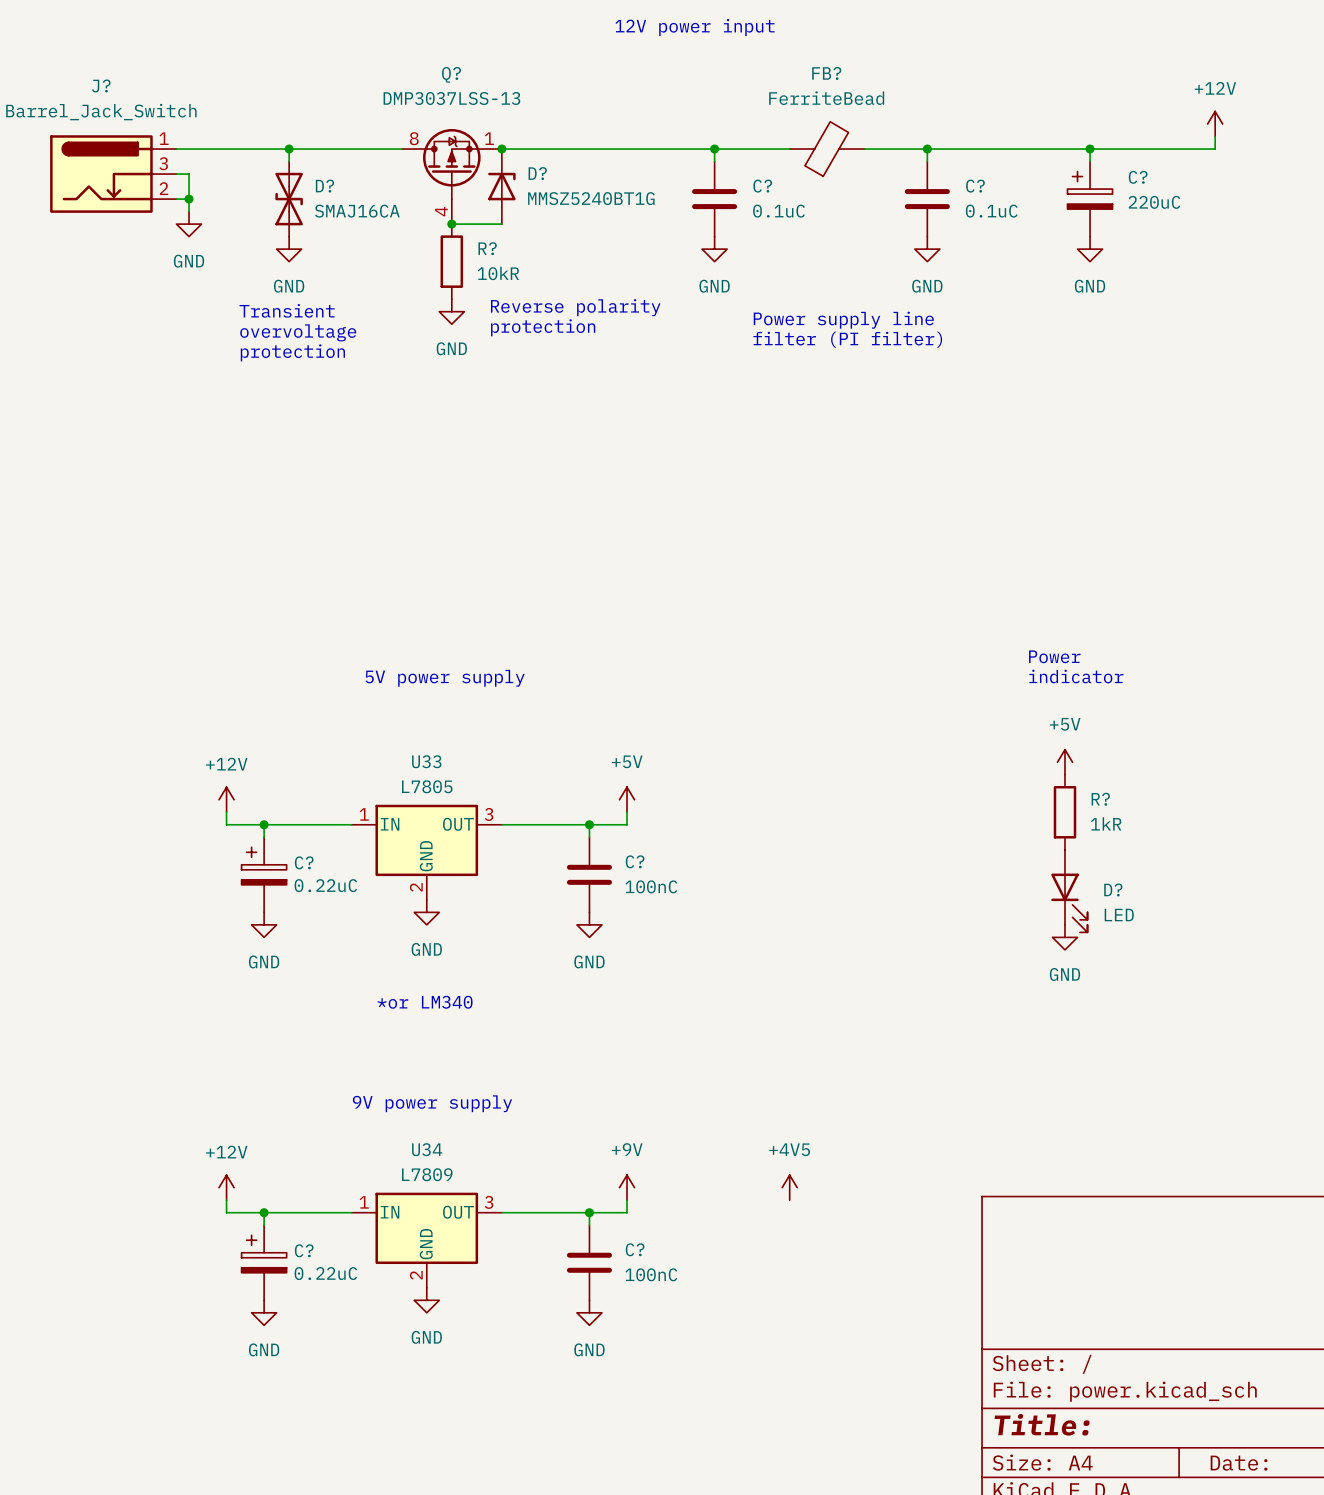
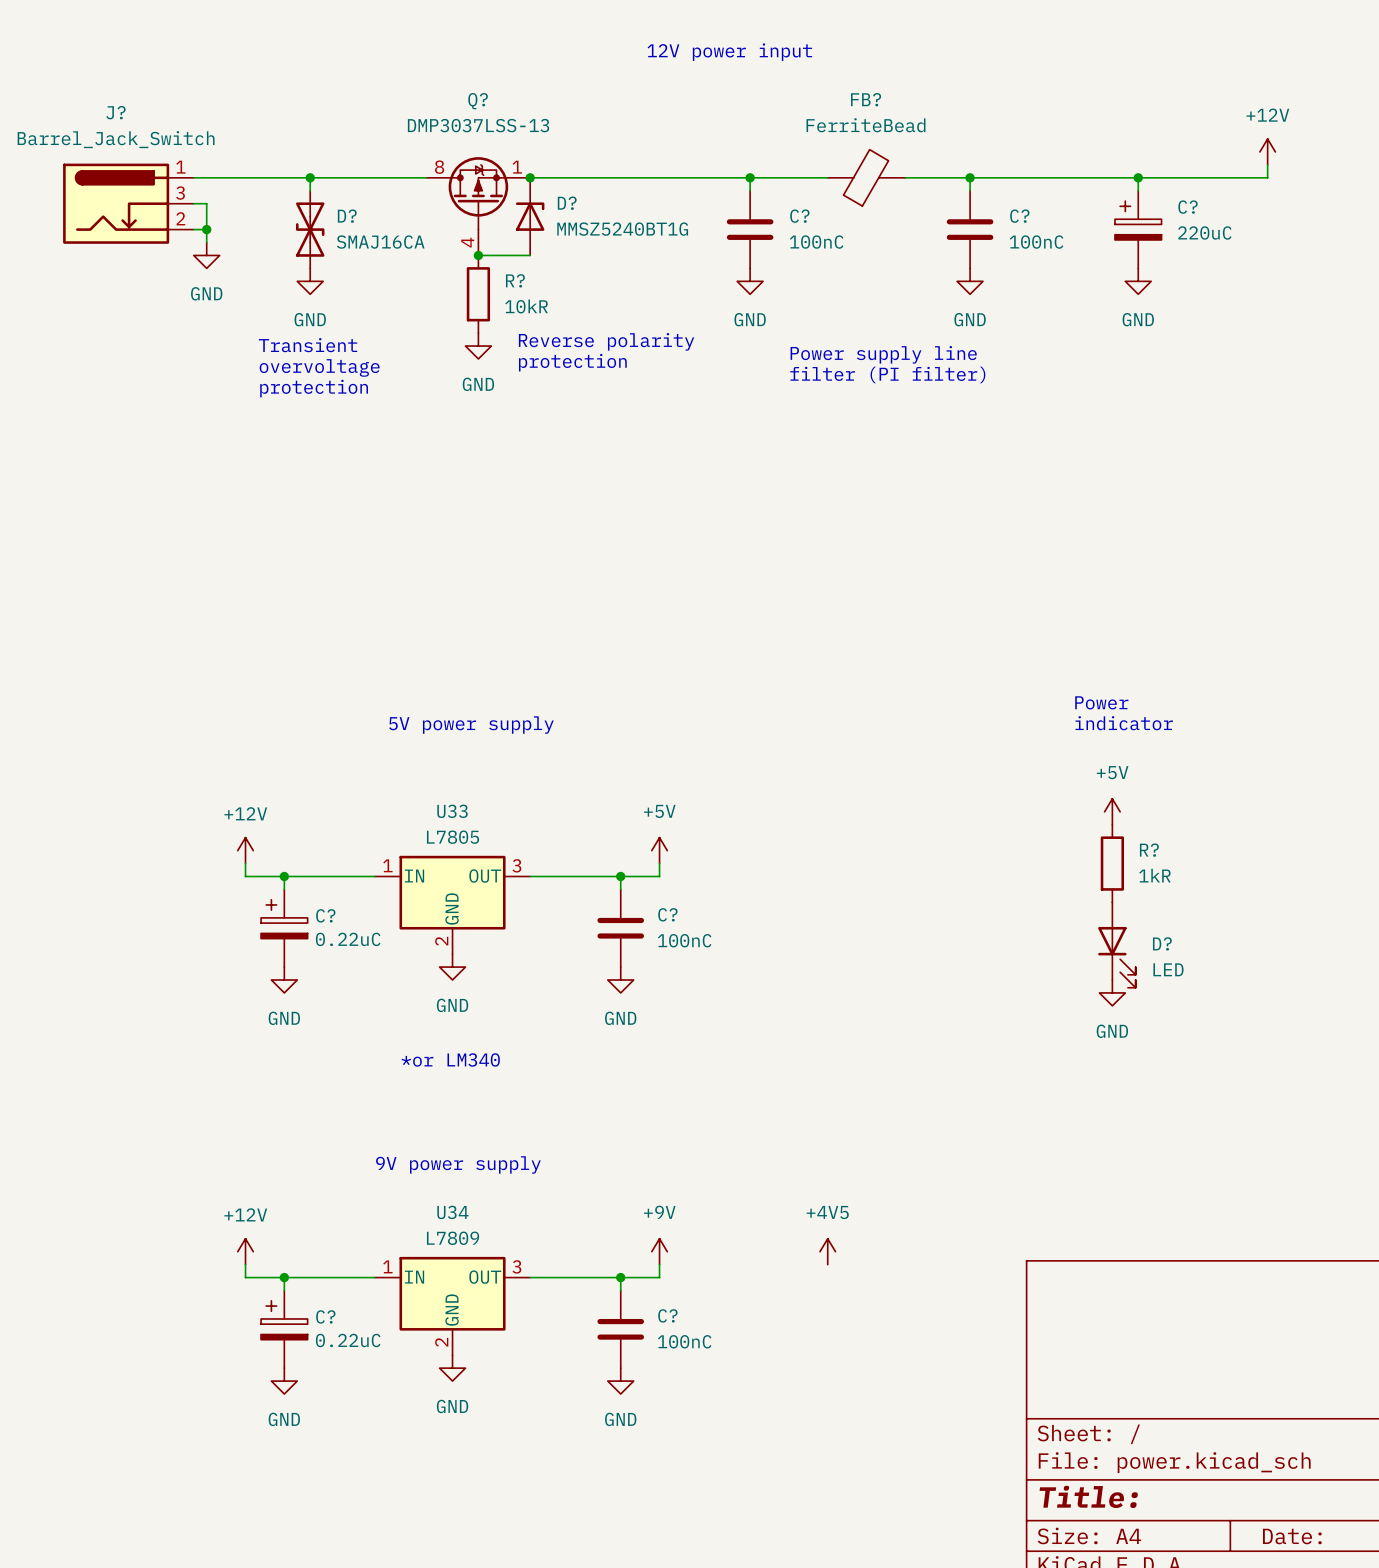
C? value: 0.1uC (778, 211) -> 100nC (816, 242)
C? value: 0.1uC (991, 211) -> 100nC (1036, 242)

